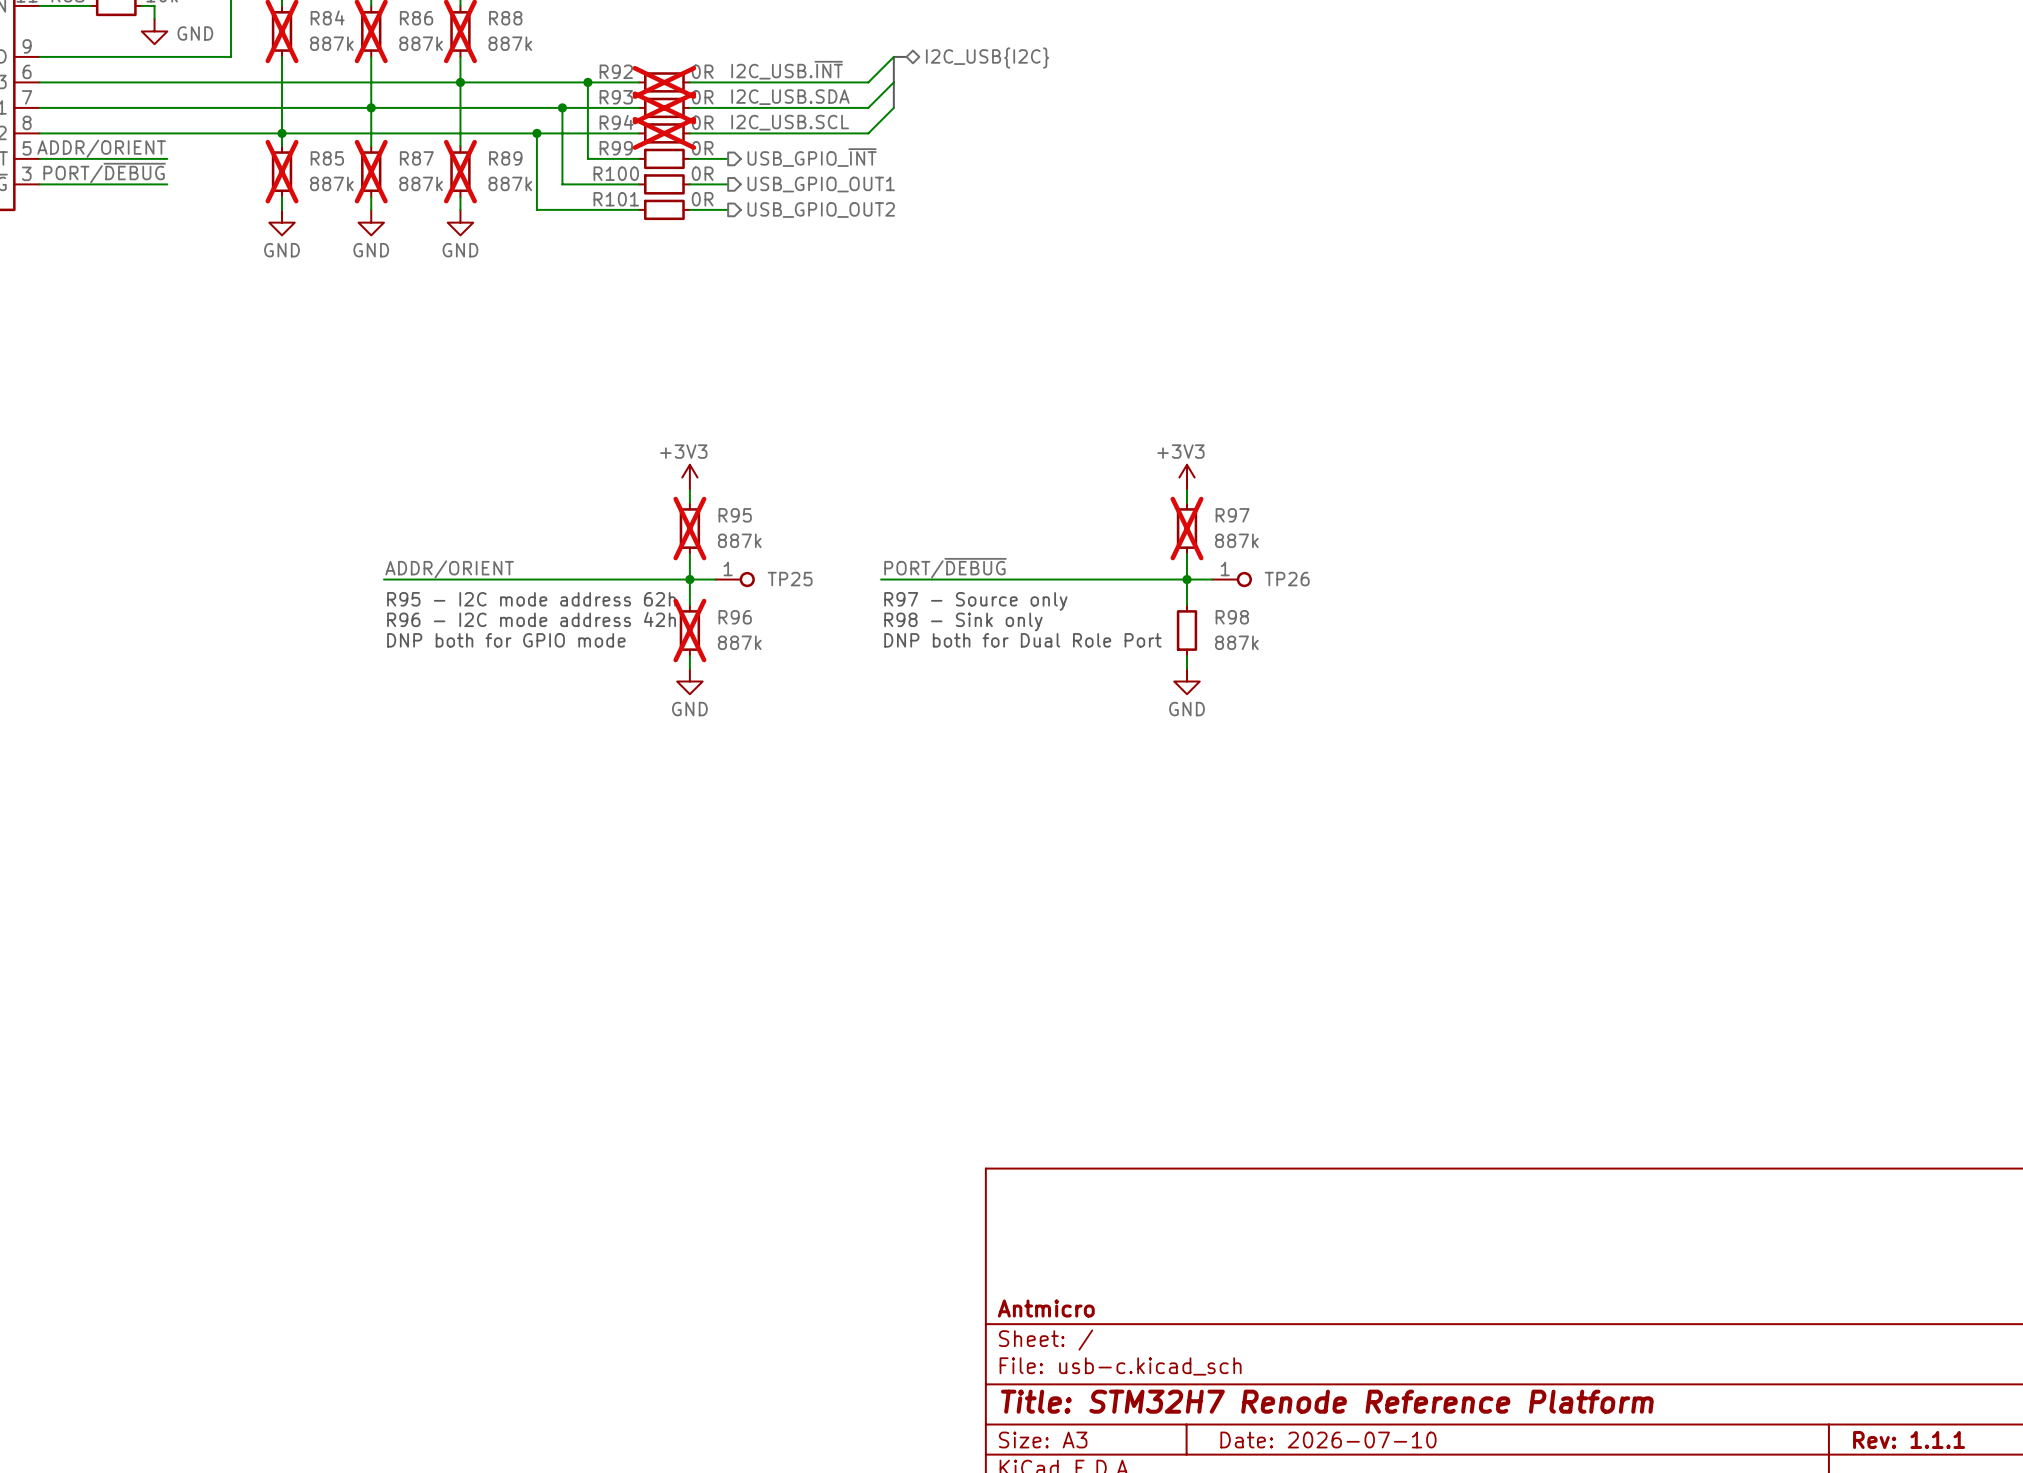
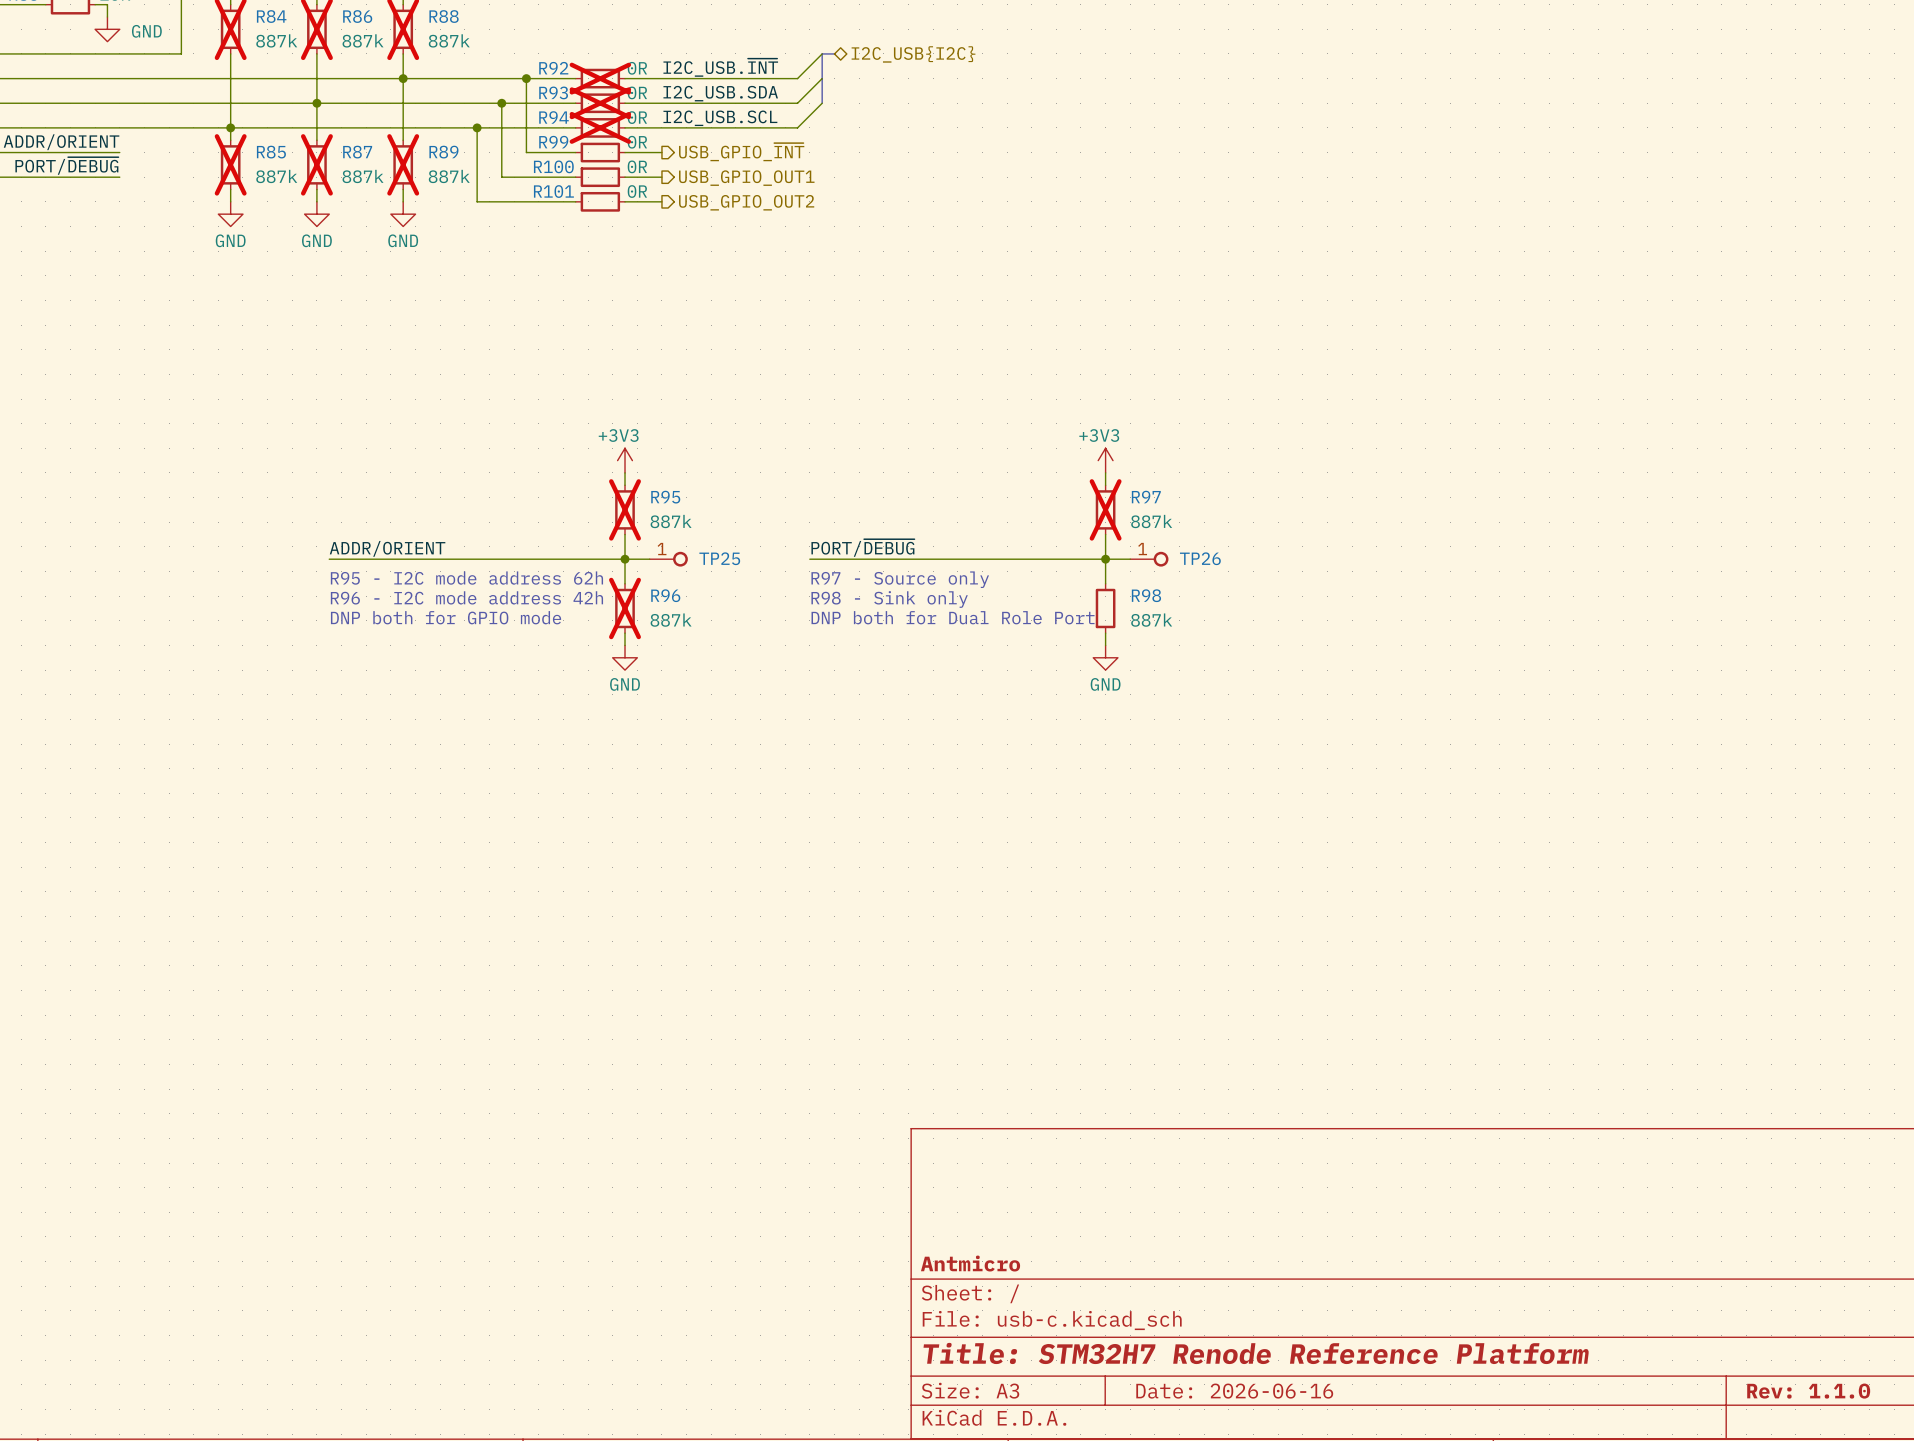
title block: Date: 2026-07-10 (1328, 1440) -> Date: 2026-06-16 (1234, 1391)
title block: Rev: 1.1.1 (1909, 1440) -> Rev: 1.1.0 (1808, 1391)

